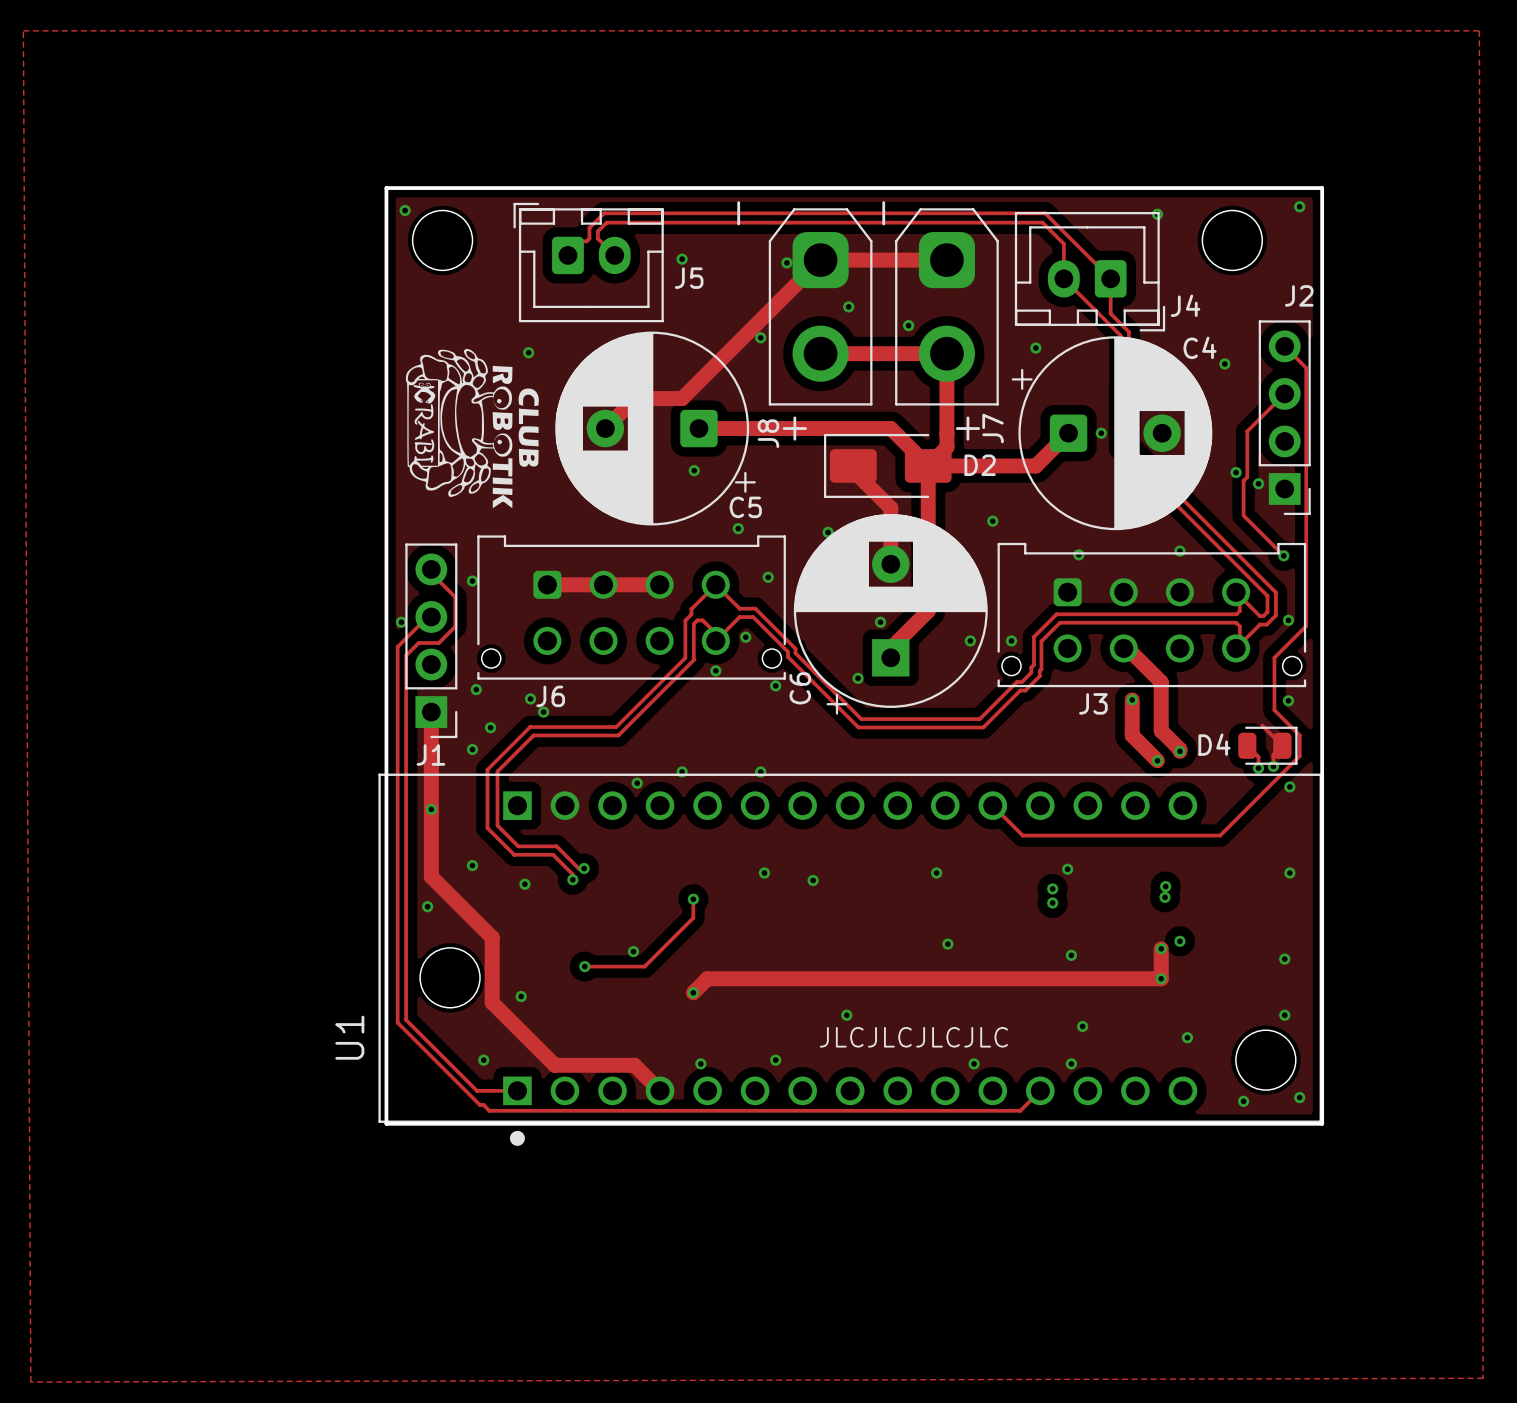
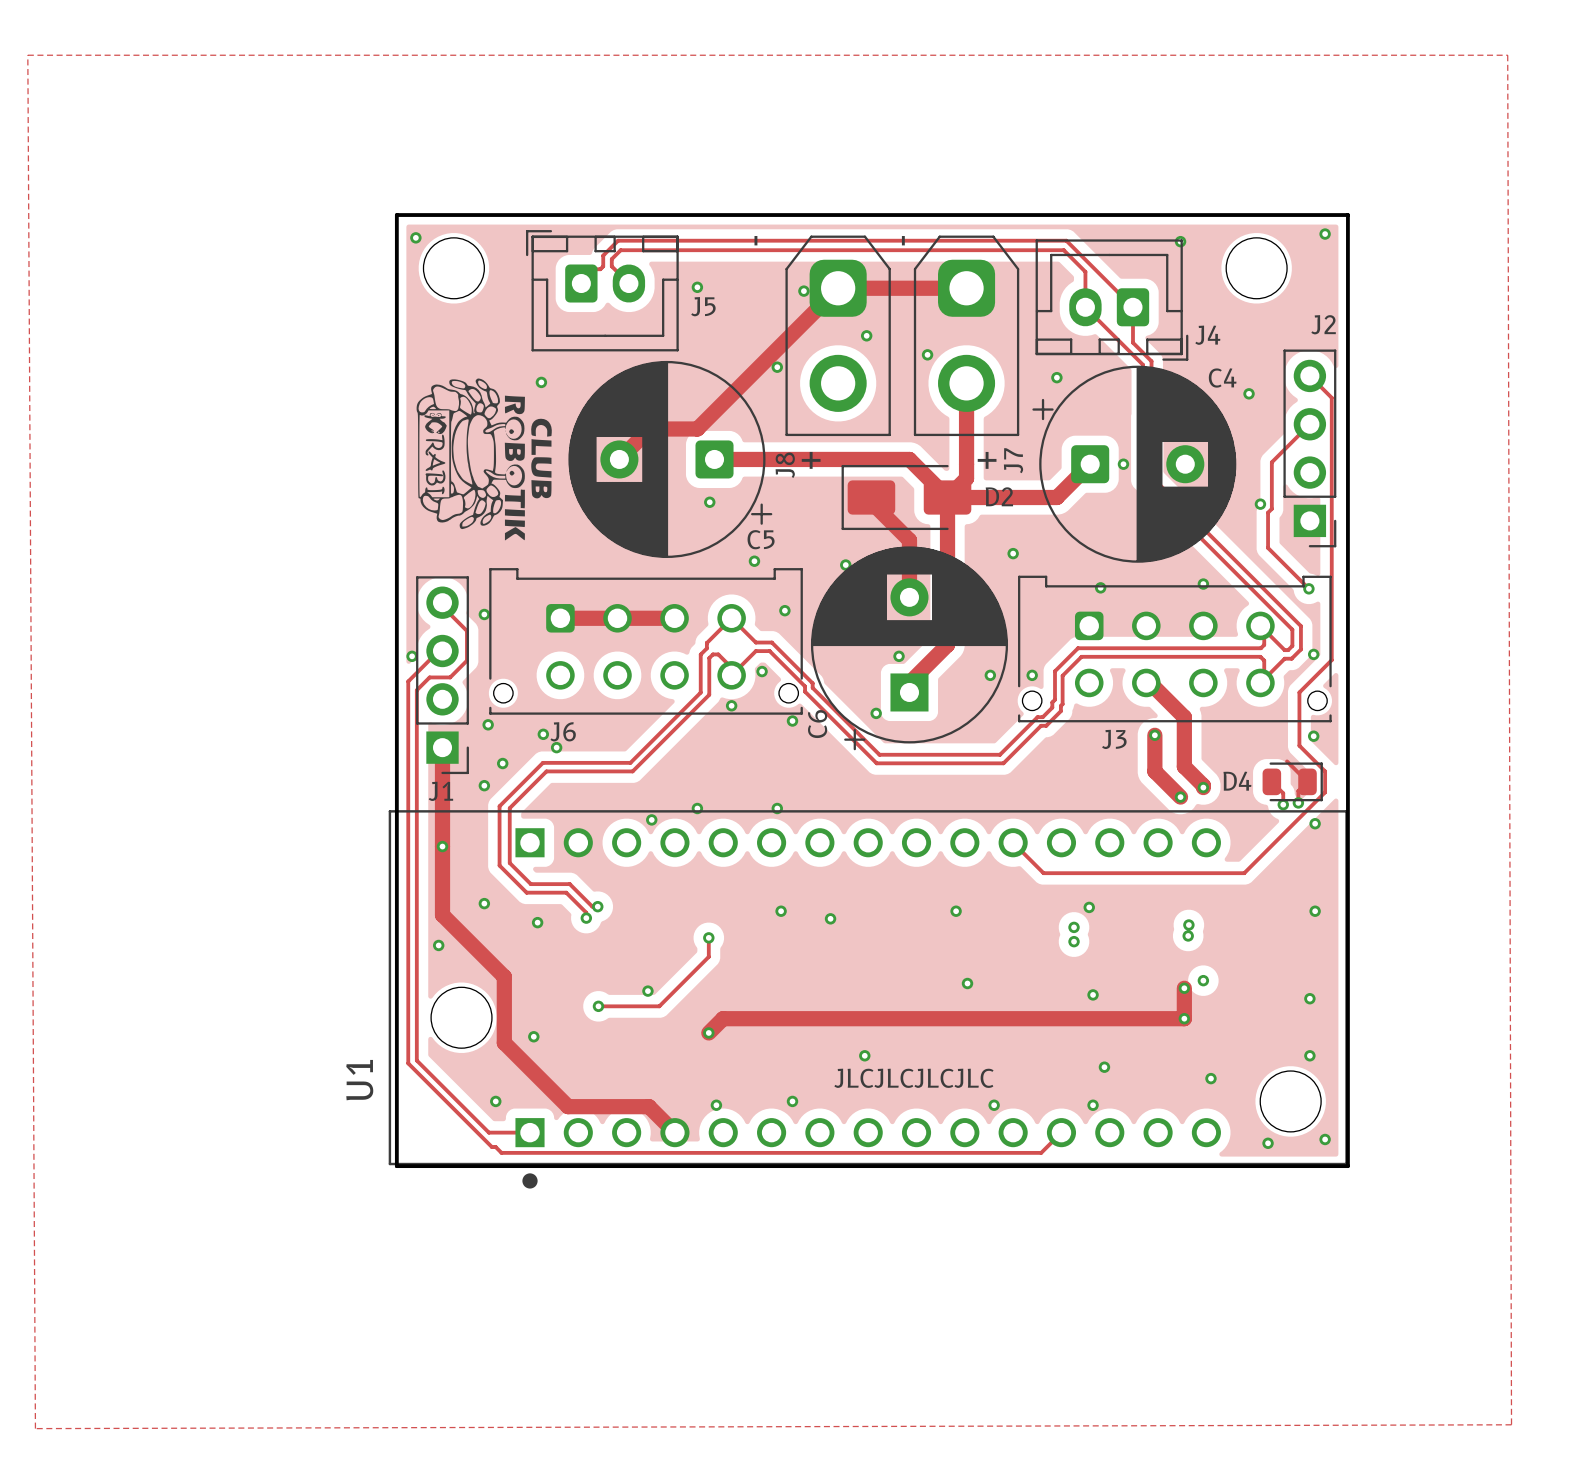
track: (820, 353) (946, 353) -> none
via: (1258, 483) -> none

